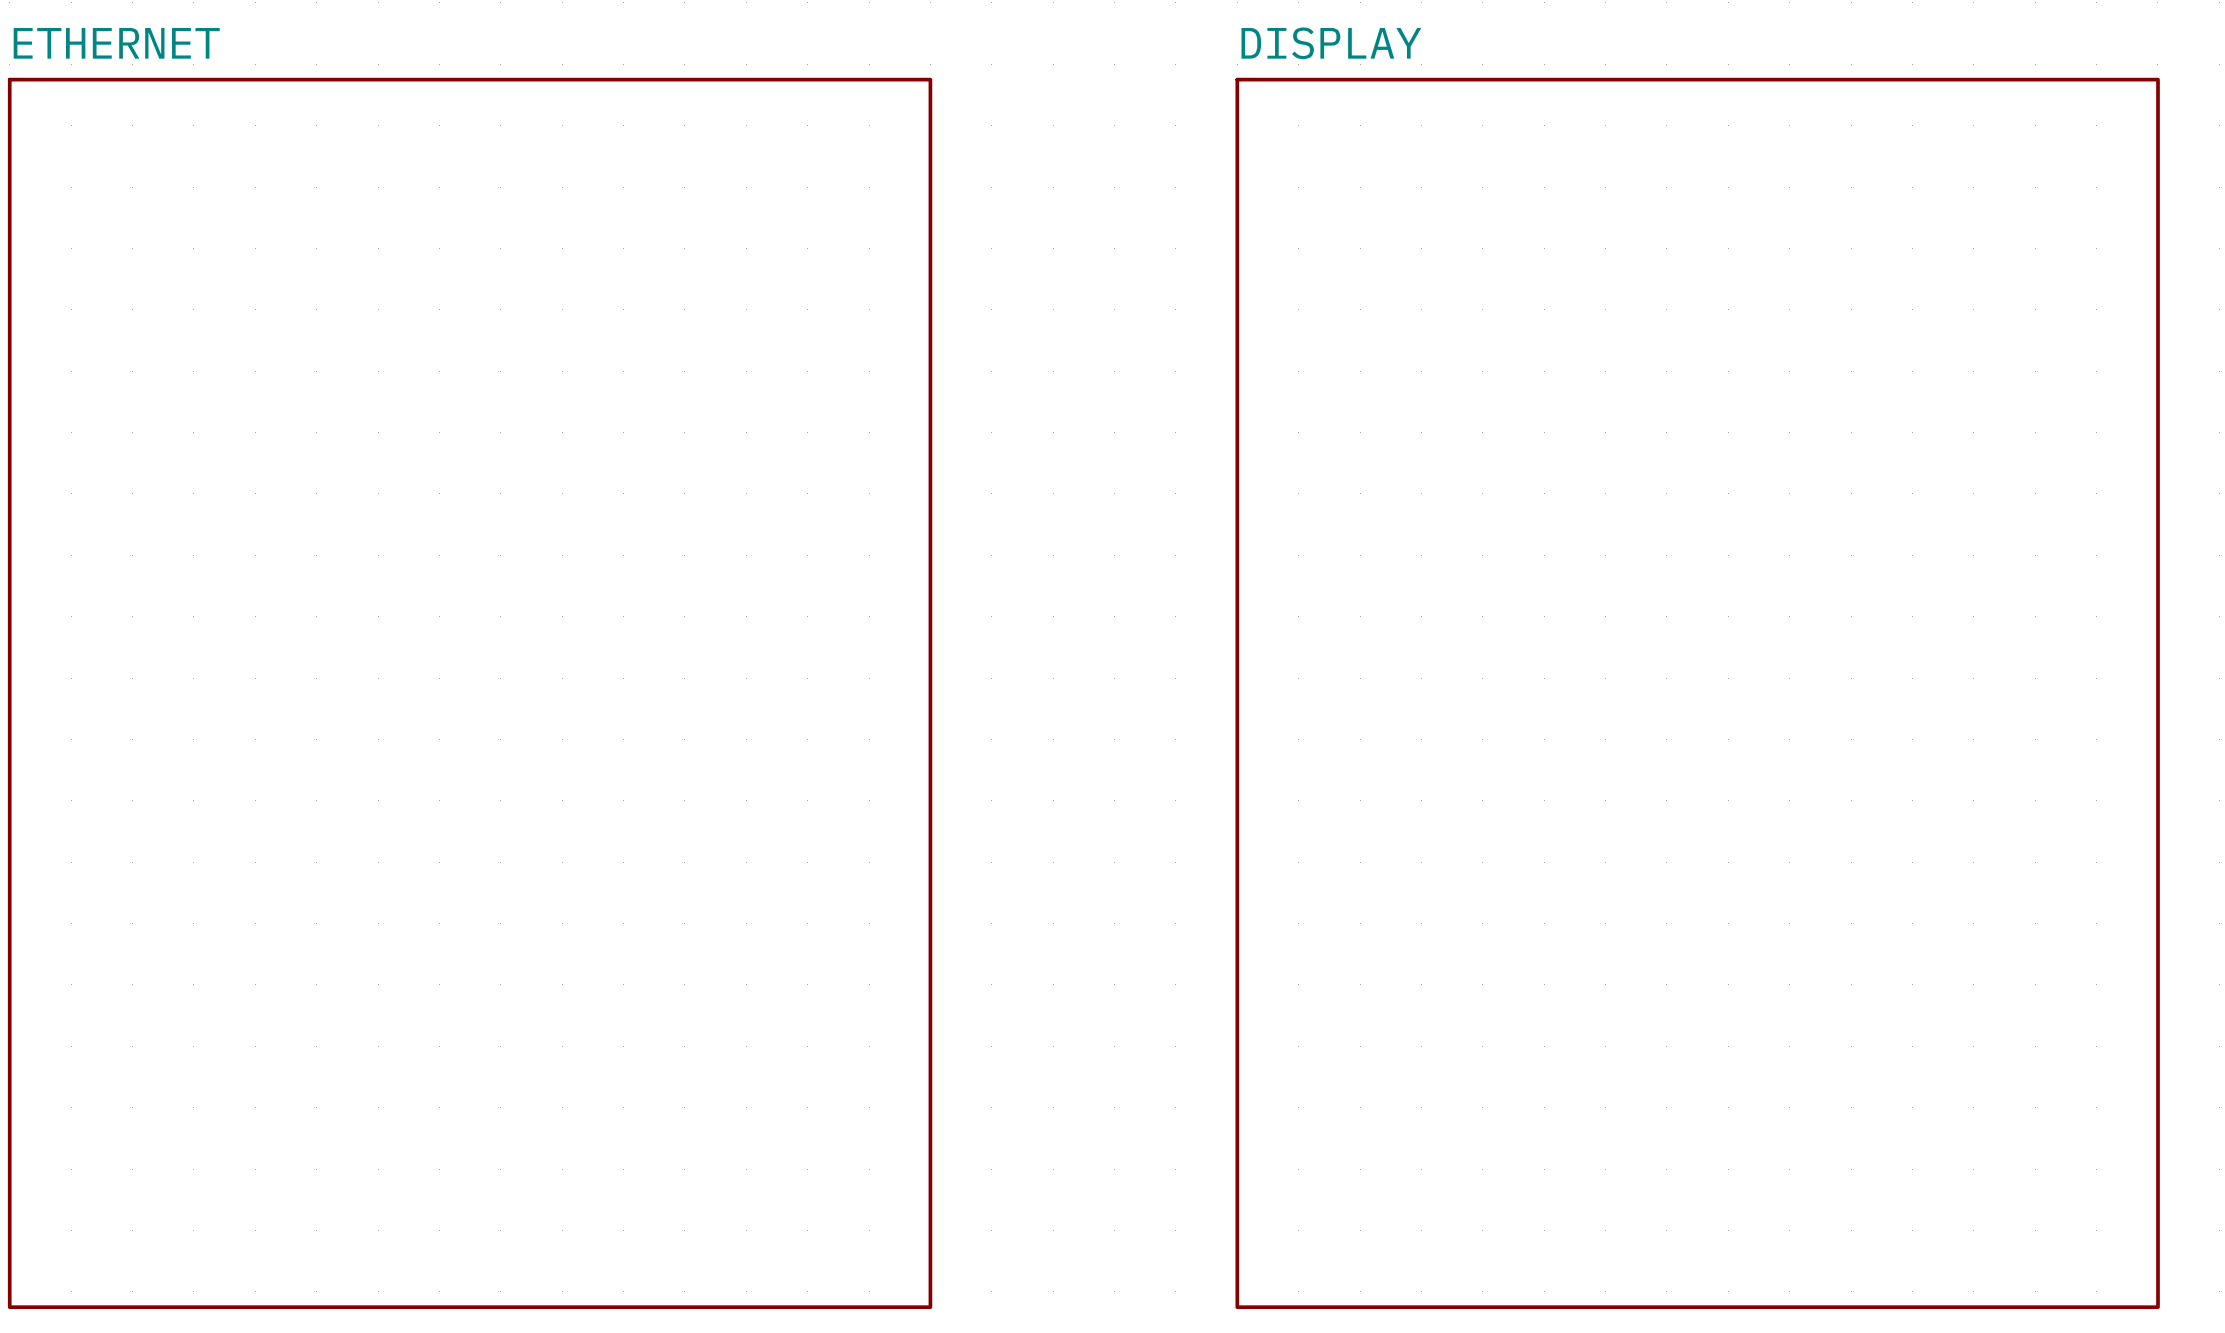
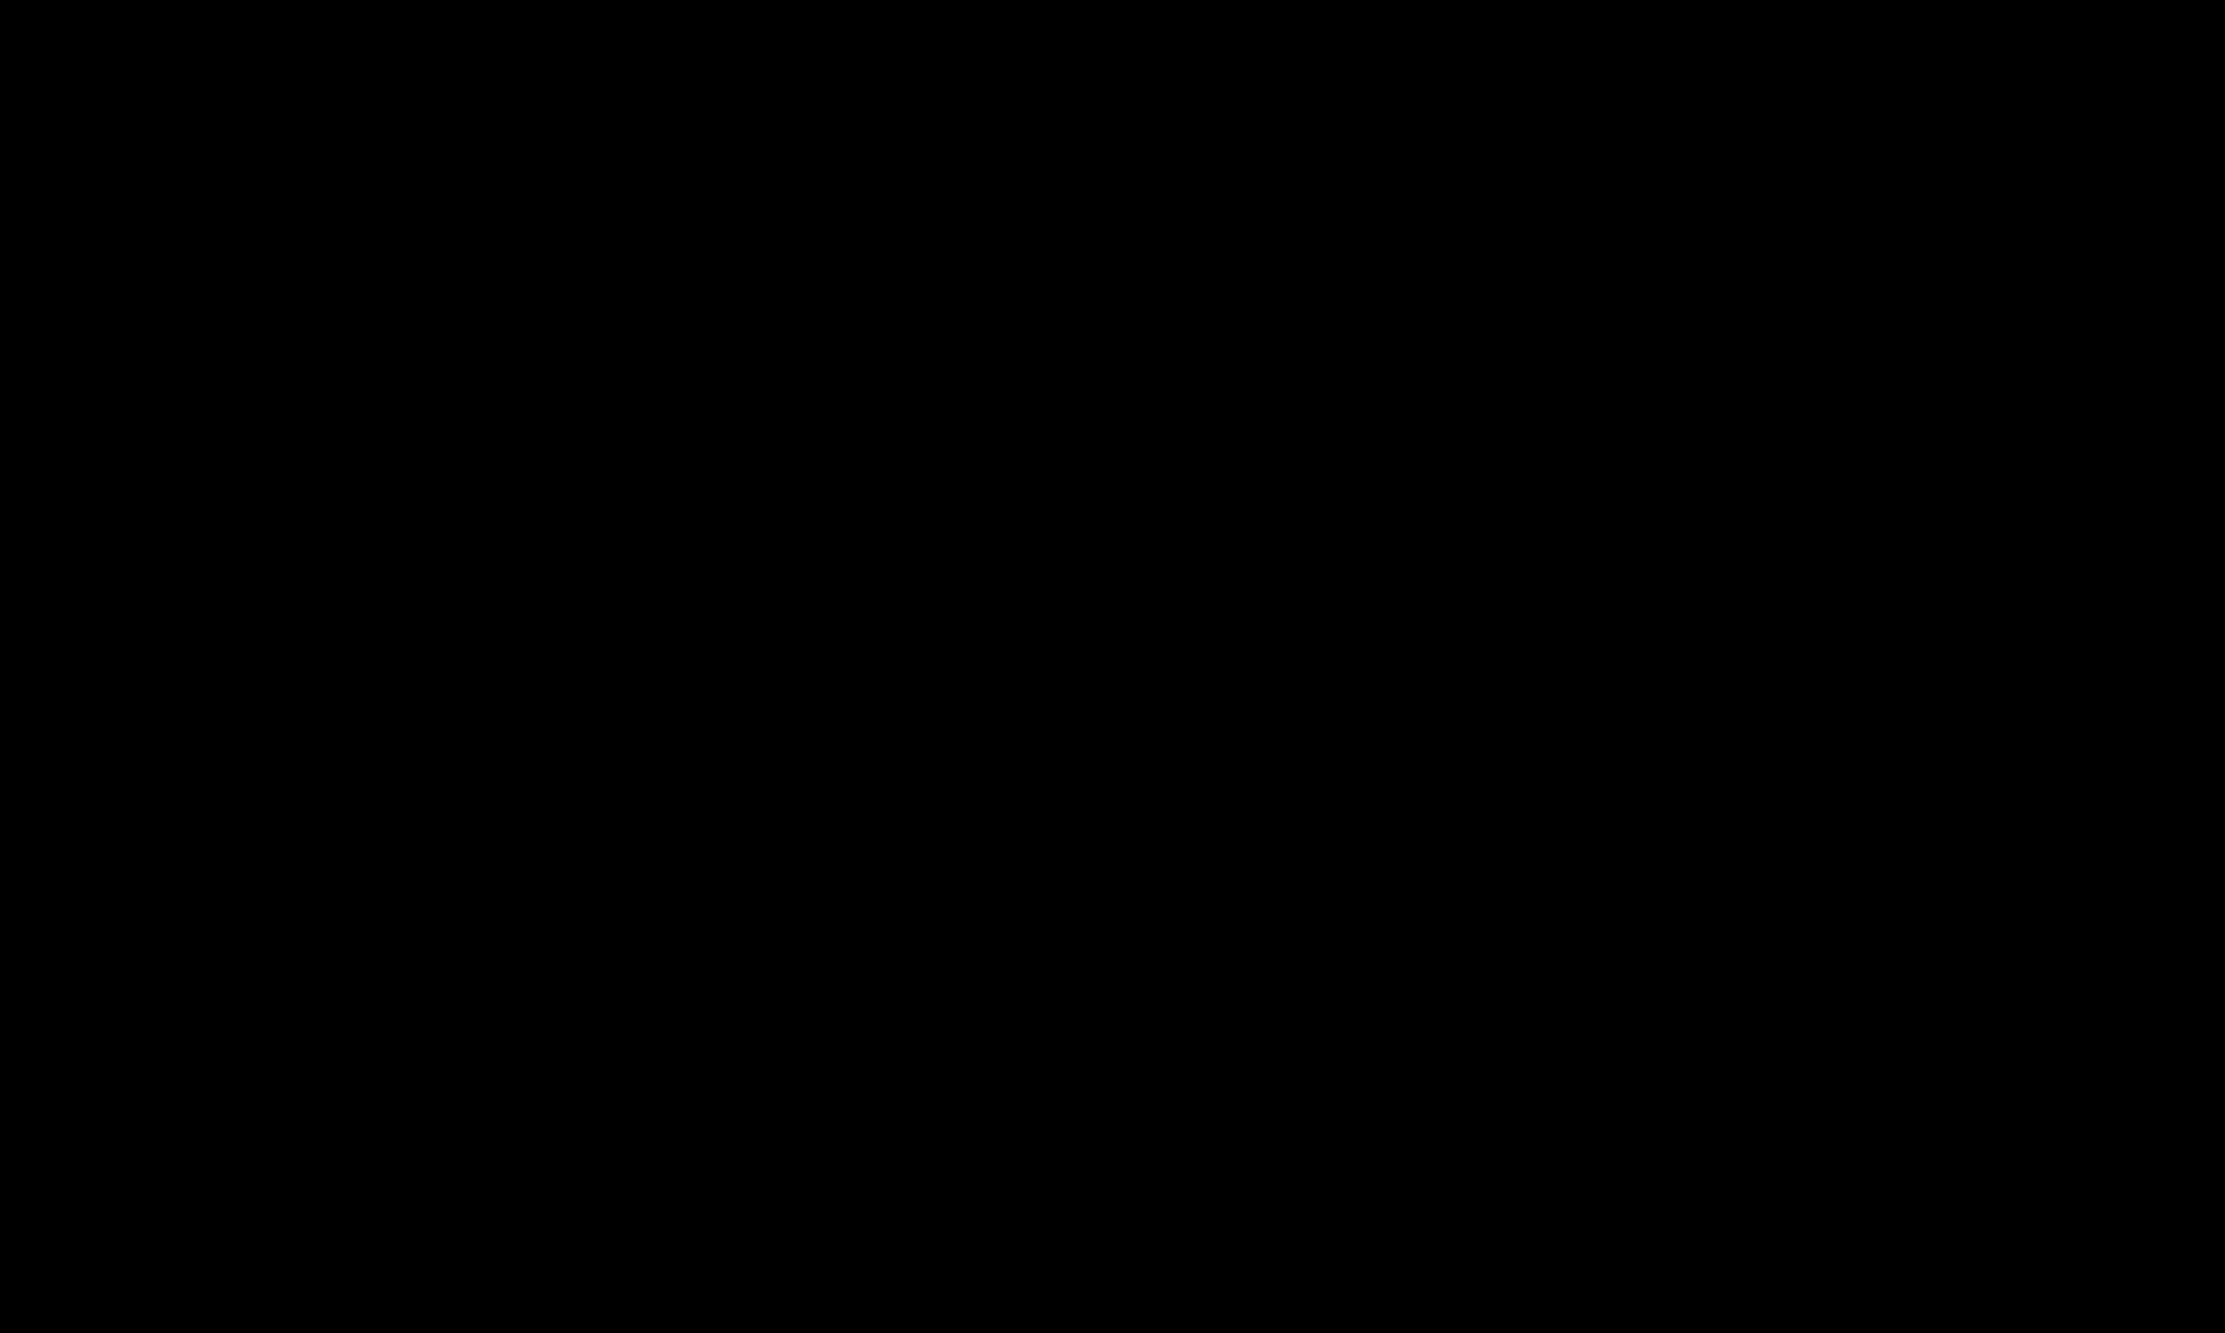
sheet ETHERNET: (470, 693) -> none
sheet DISPLAY: (1697, 693) -> none

